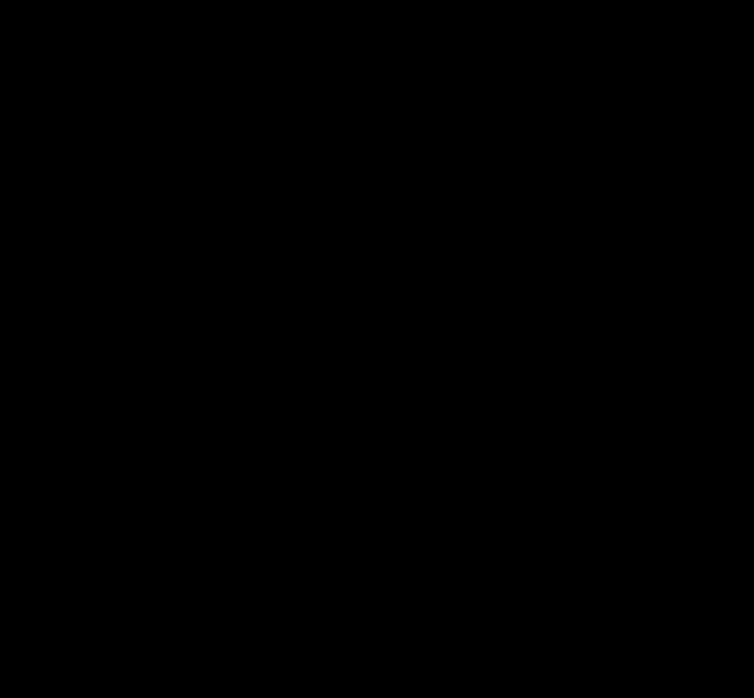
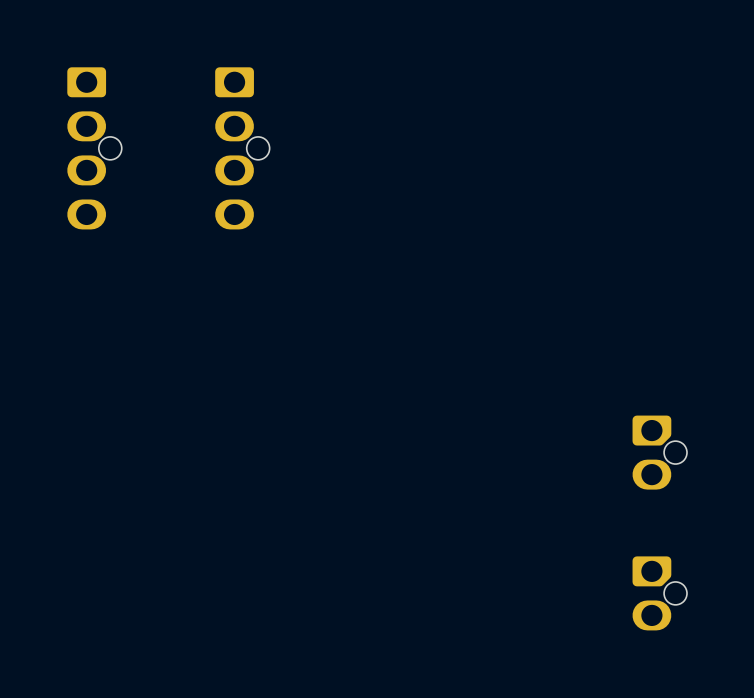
part: none -> (94, 148)
part: none -> (242, 148)
part: none -> (659, 452)
part: none -> (659, 593)

